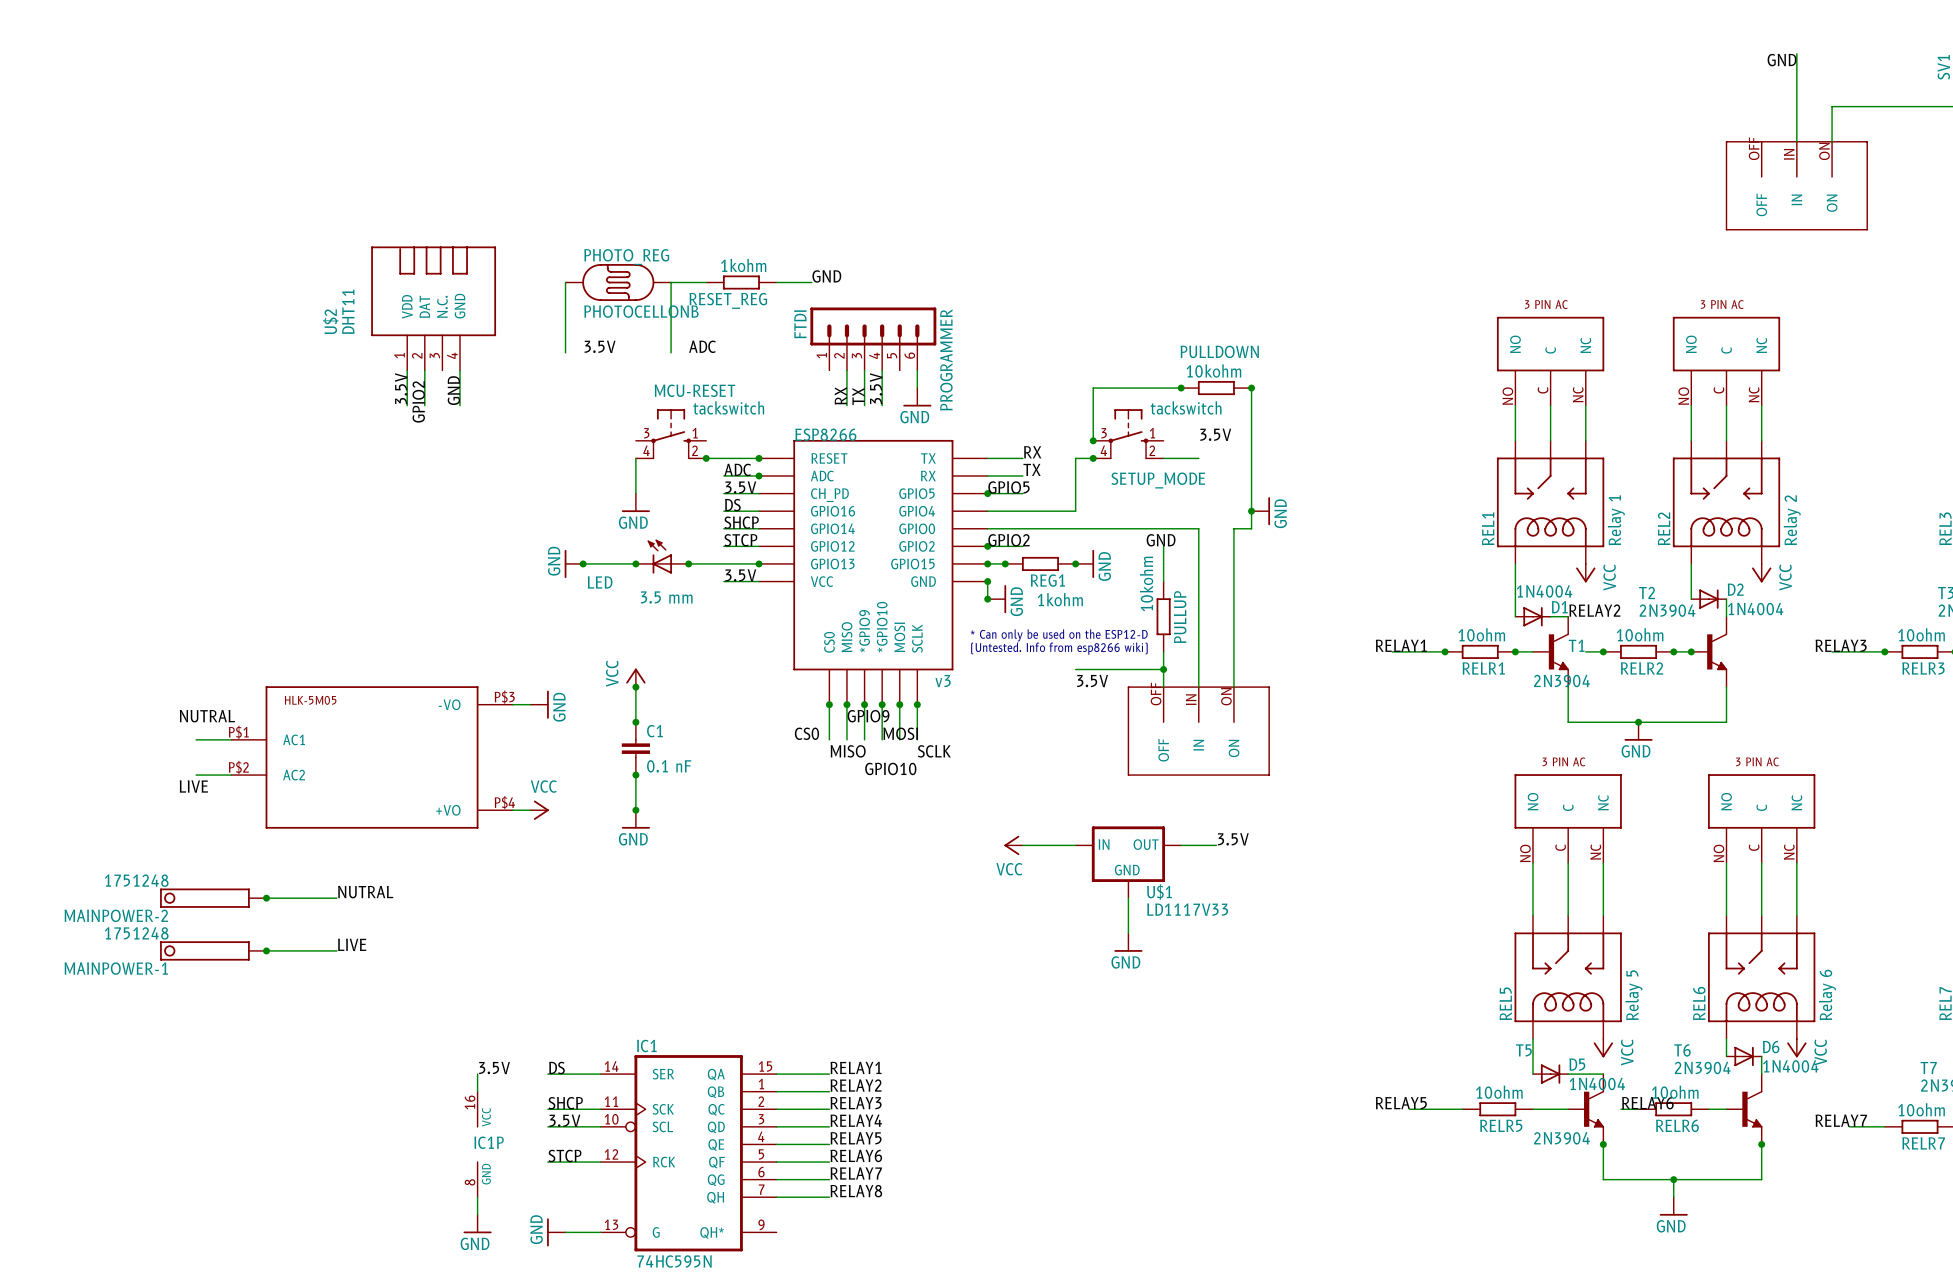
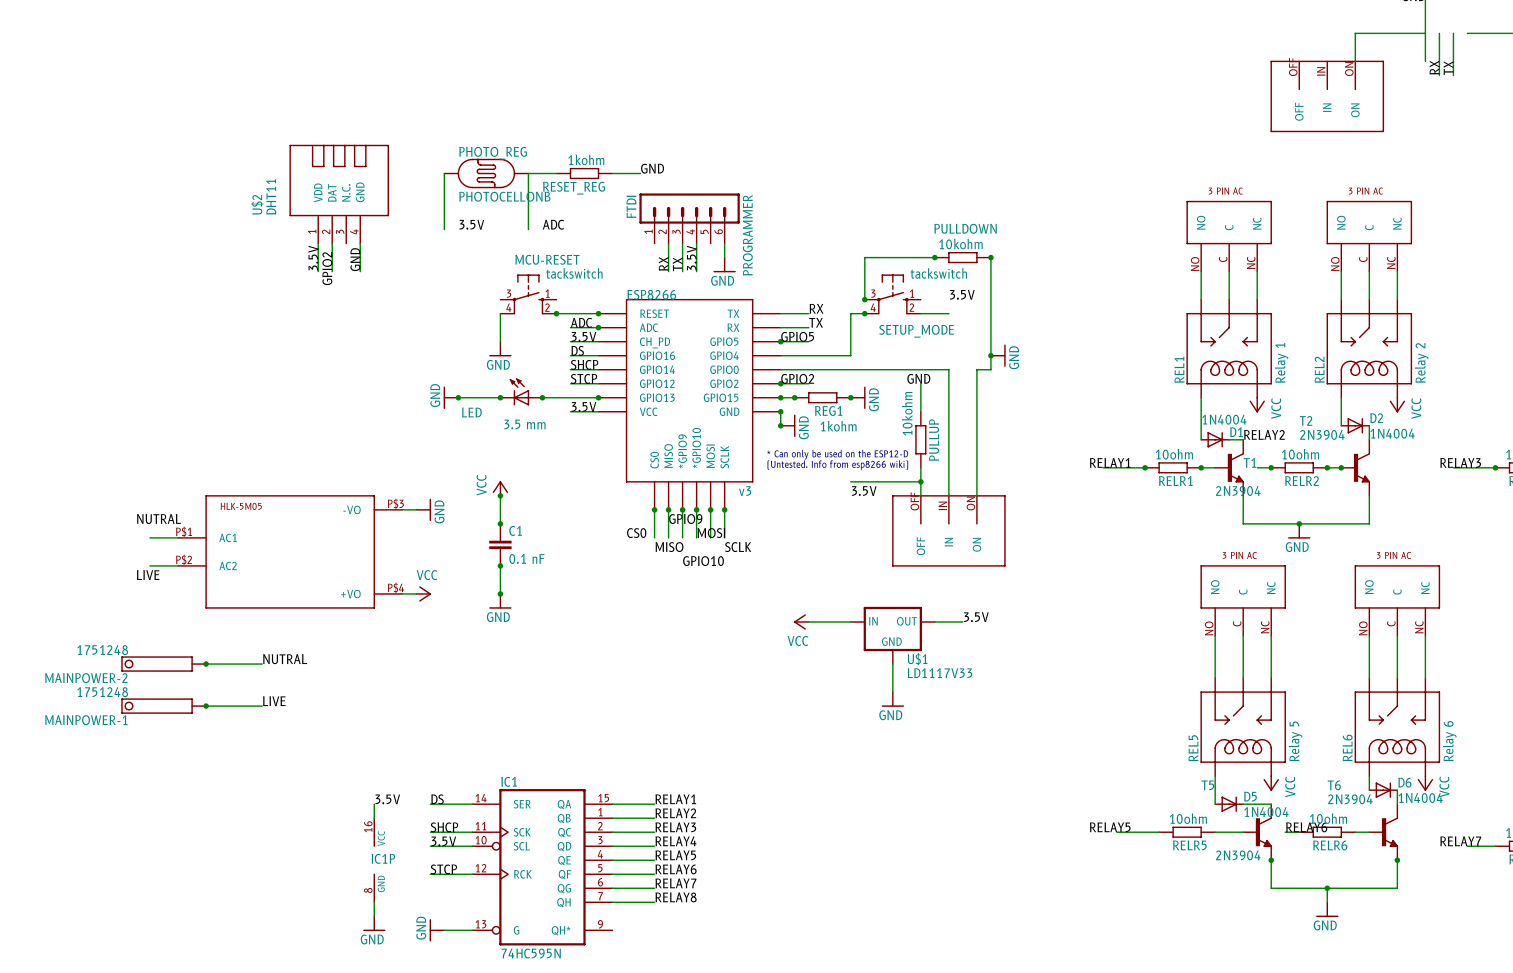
wire: none -> (1425, 33) (1355, 33) (1355, 61)
wire: none -> (1439, 33) (1439, 75)
wire: (1832, 106) (1849, 106) -> none
label: none -> RX (1434, 67)
label: none -> TX (1448, 68)
part position: (1796, 185) -> (1327, 96)

